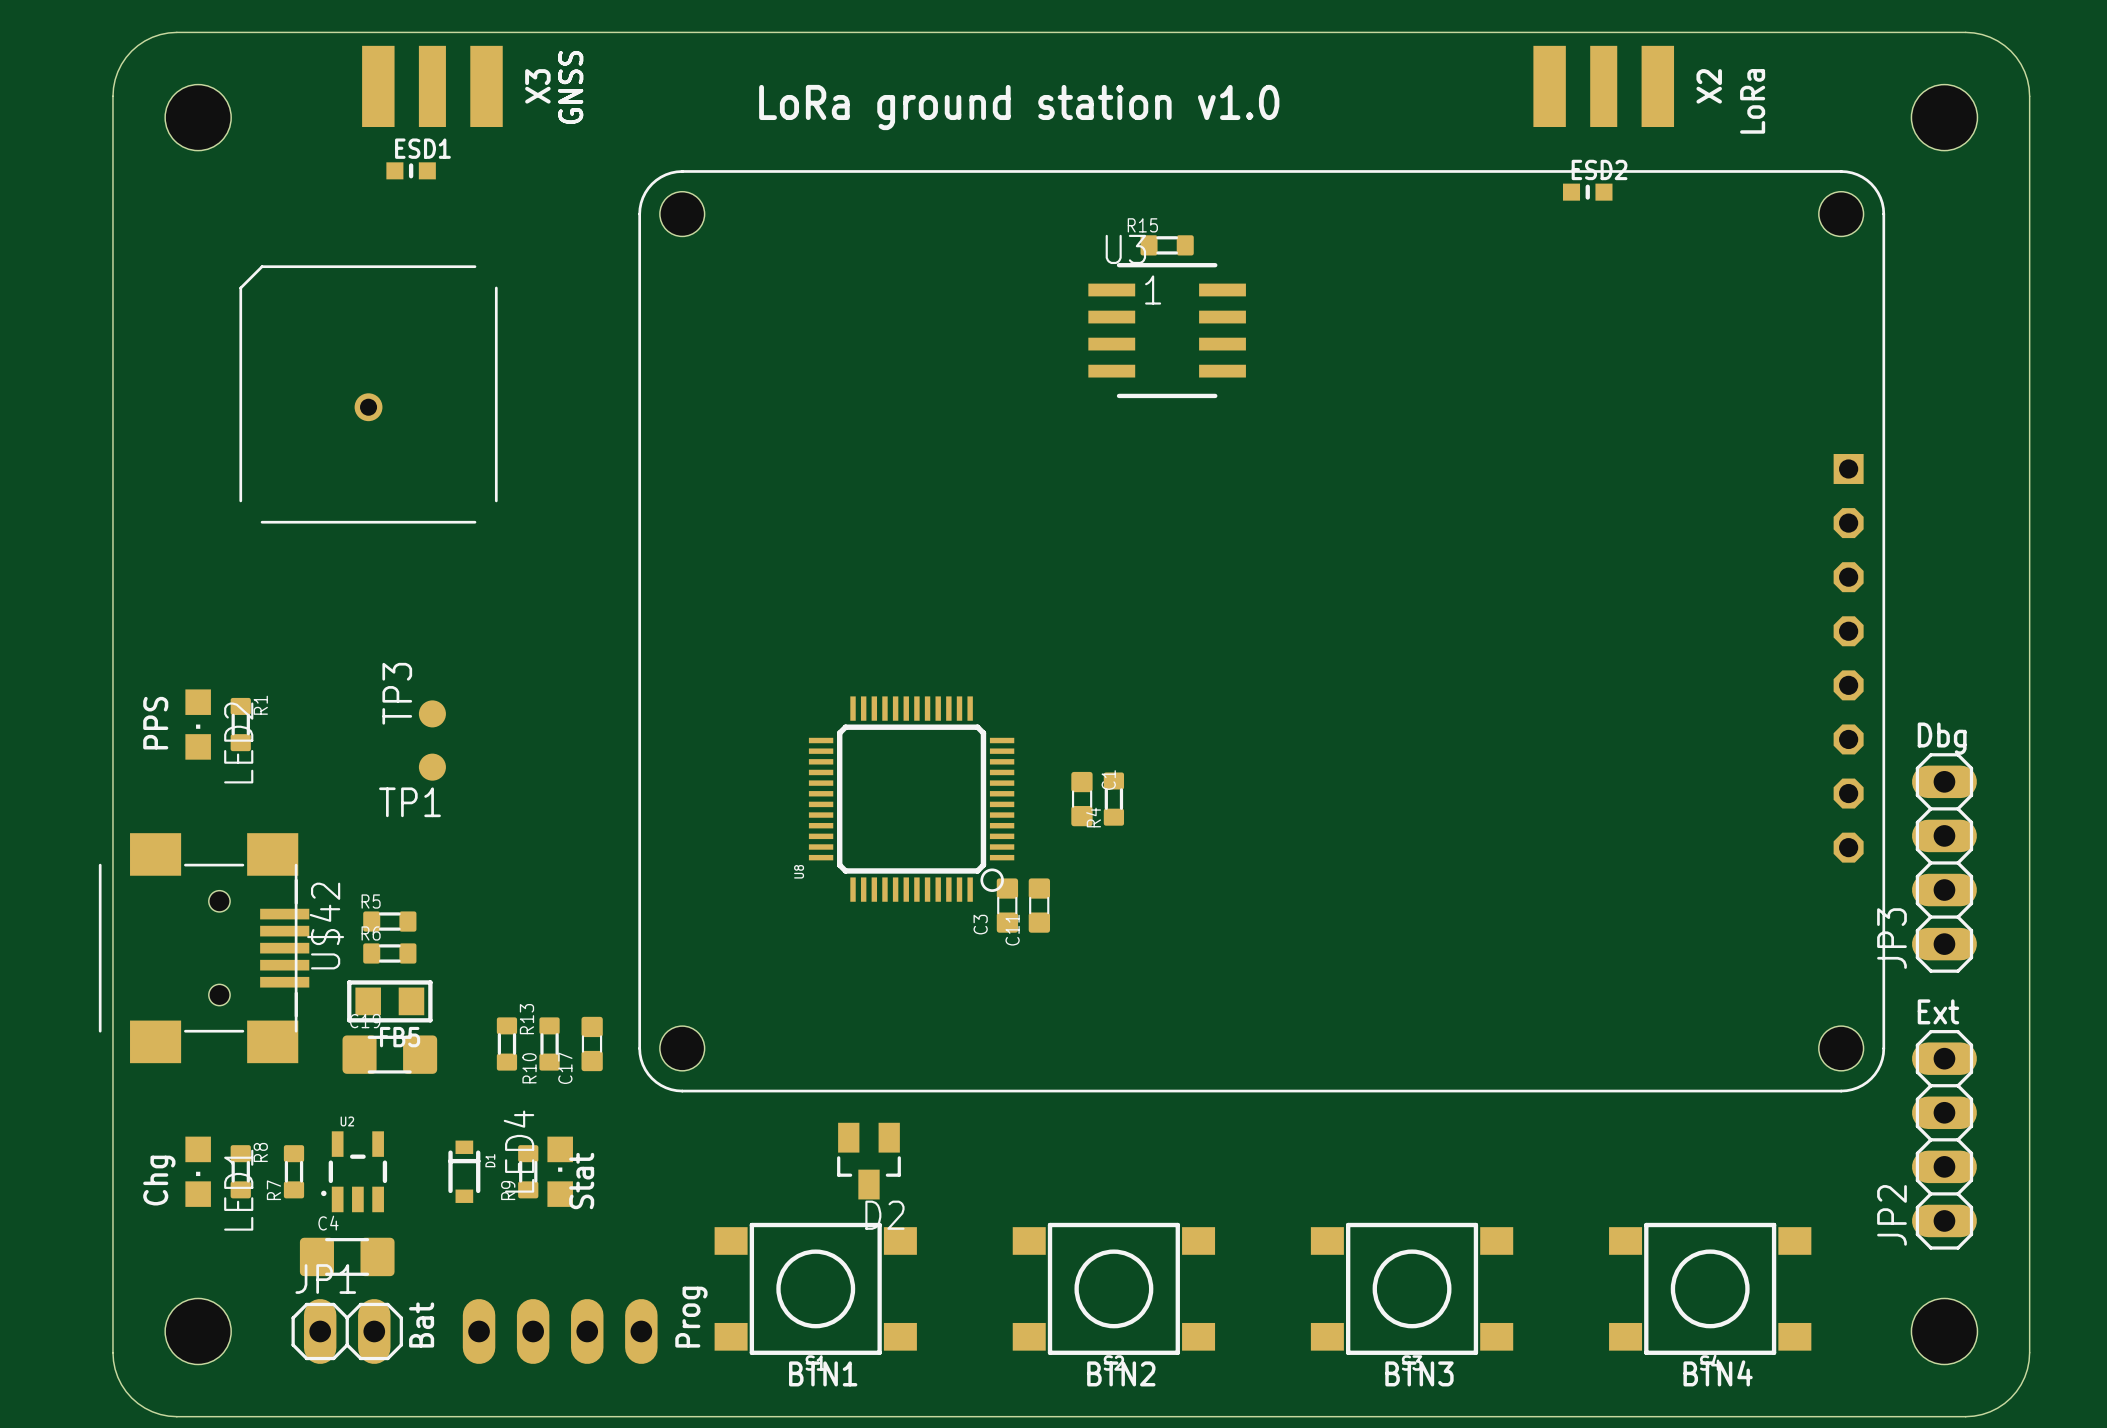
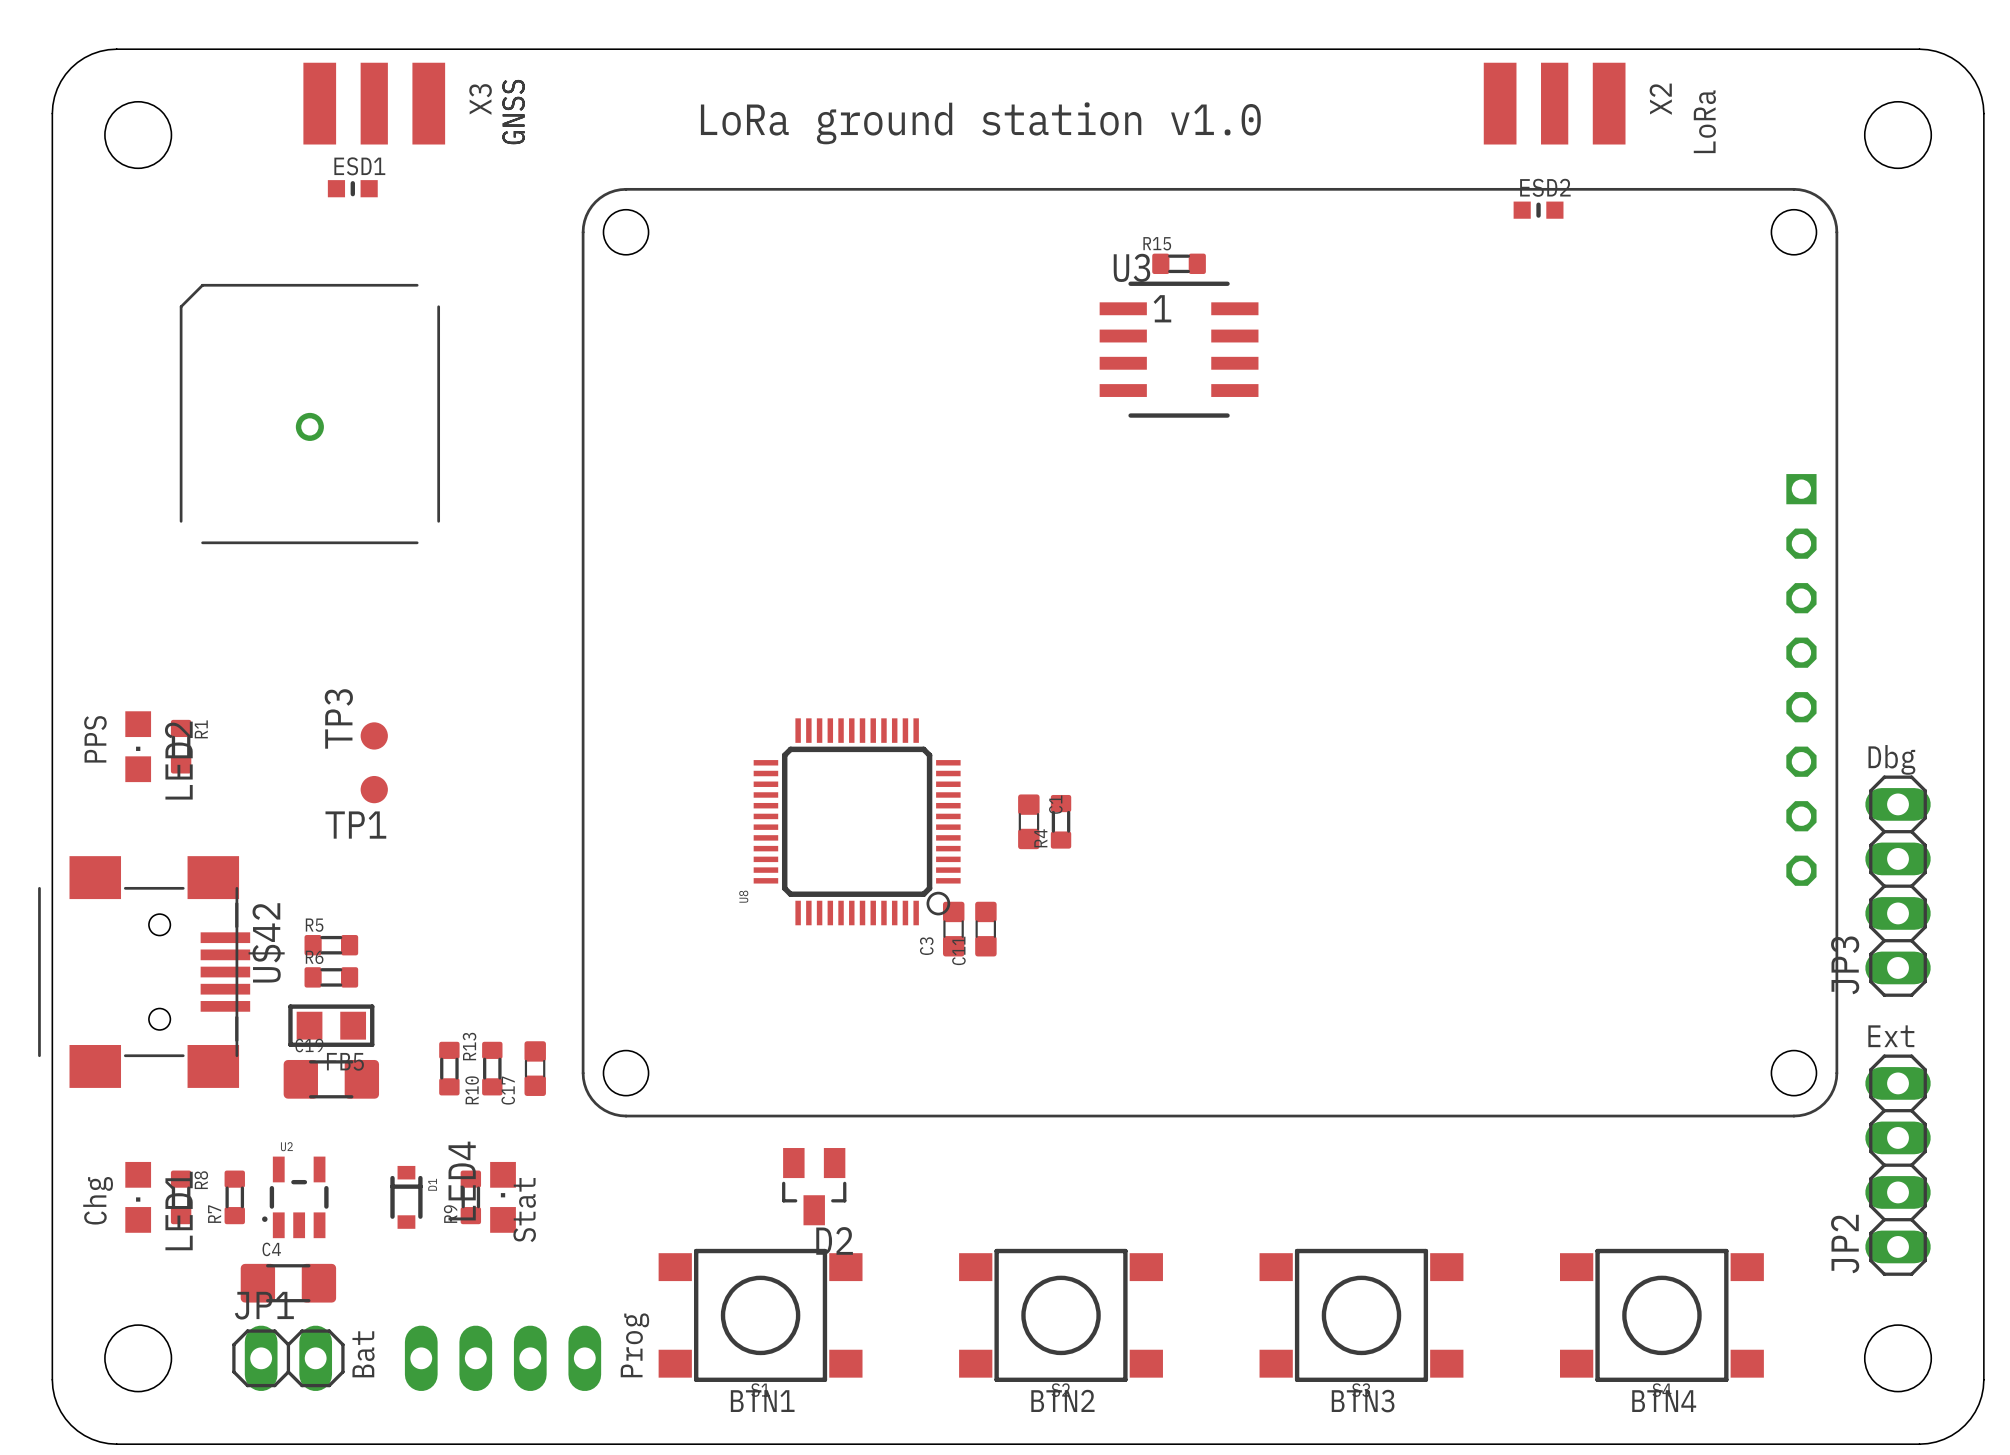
R15 position: (1167, 245) -> (1179, 263)
U3 position: (1167, 330) -> (1179, 349)

